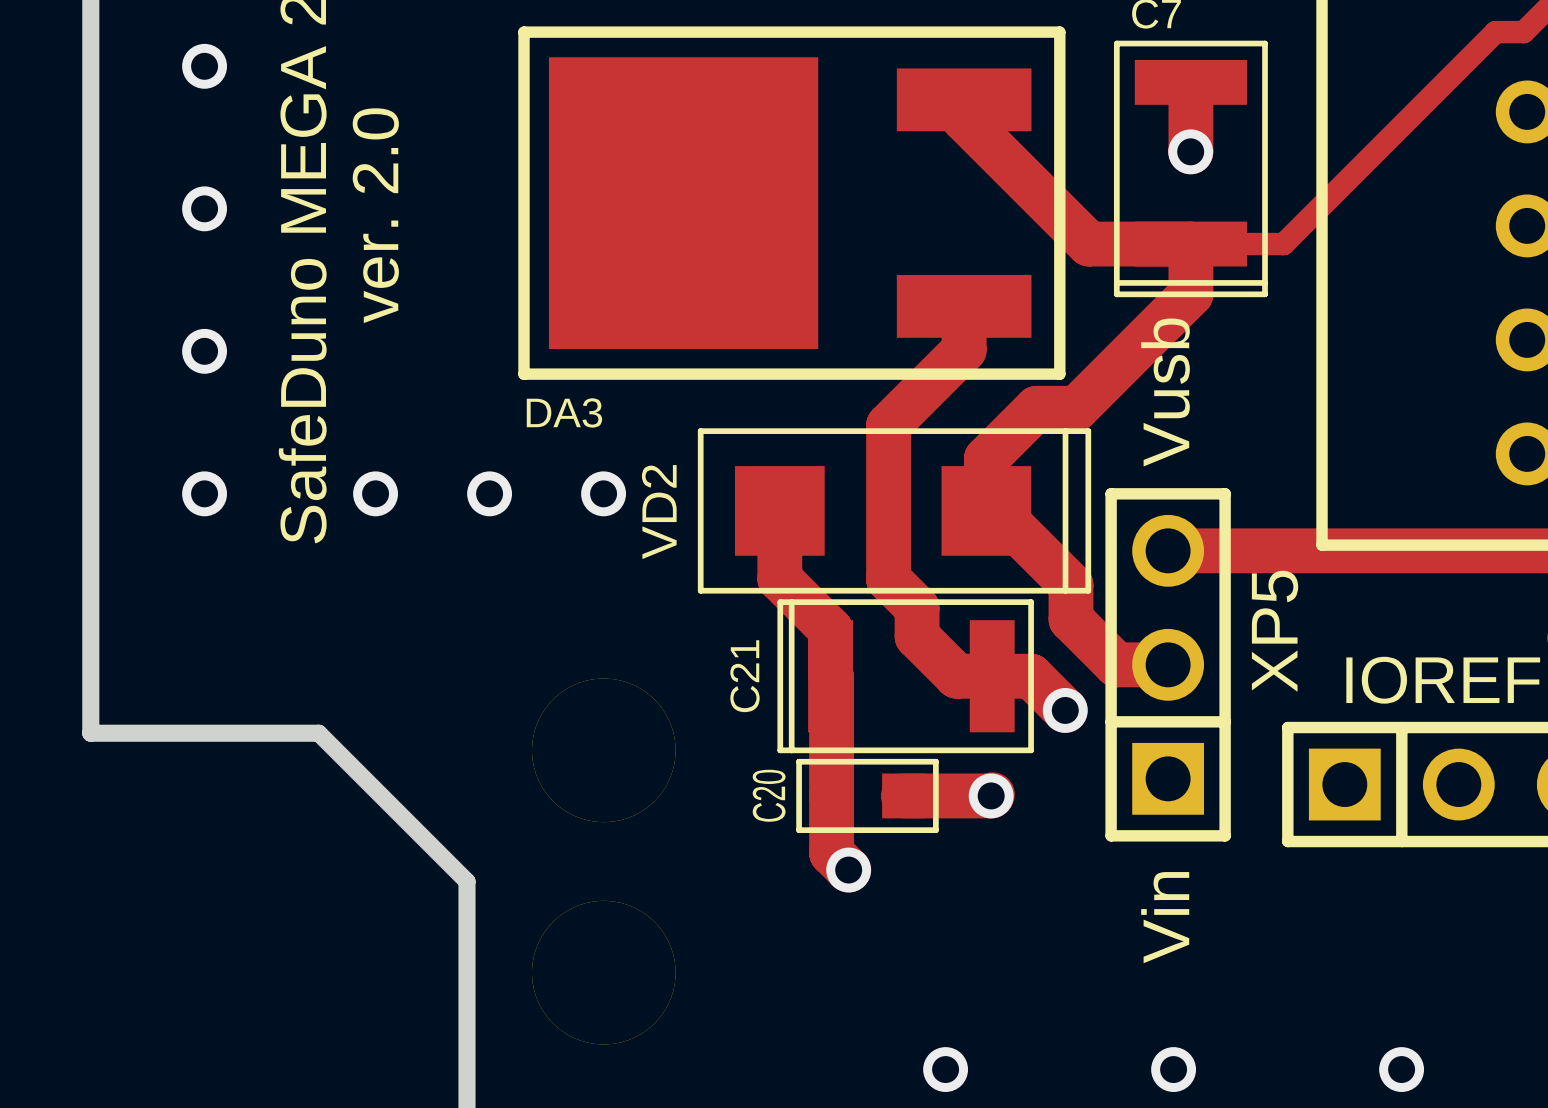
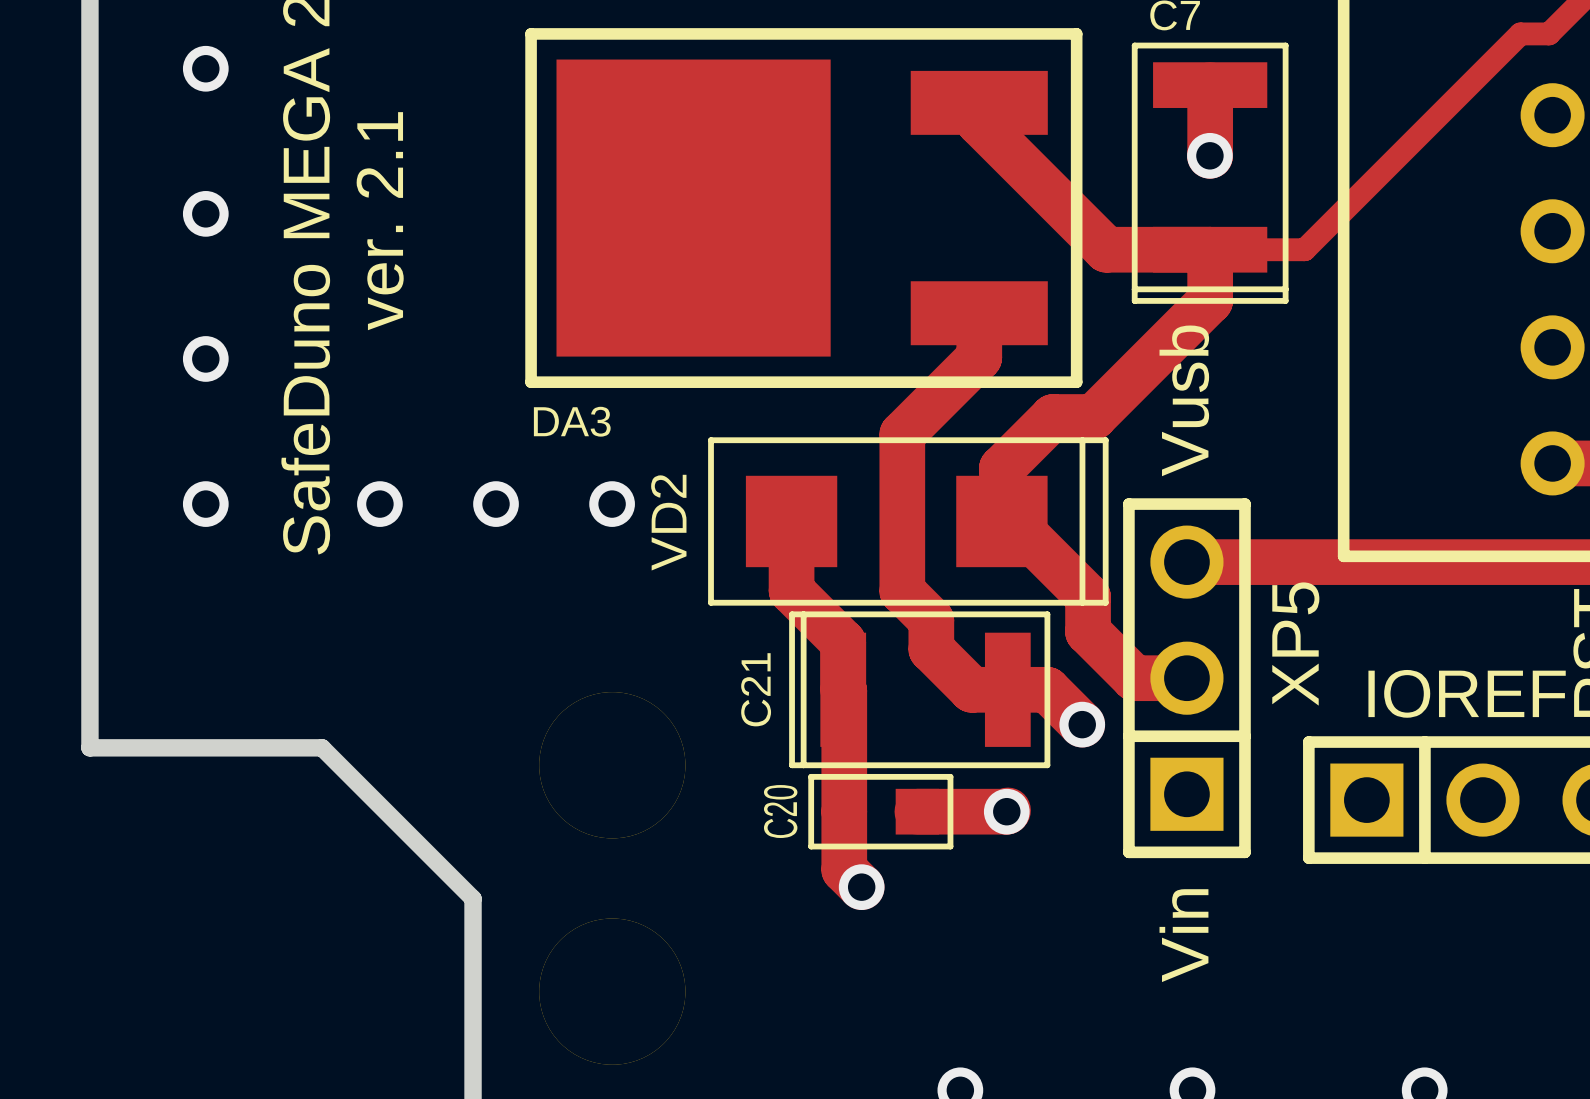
text: ver. 2.0 (375, 215) -> ver. 2.1 (380, 221)

